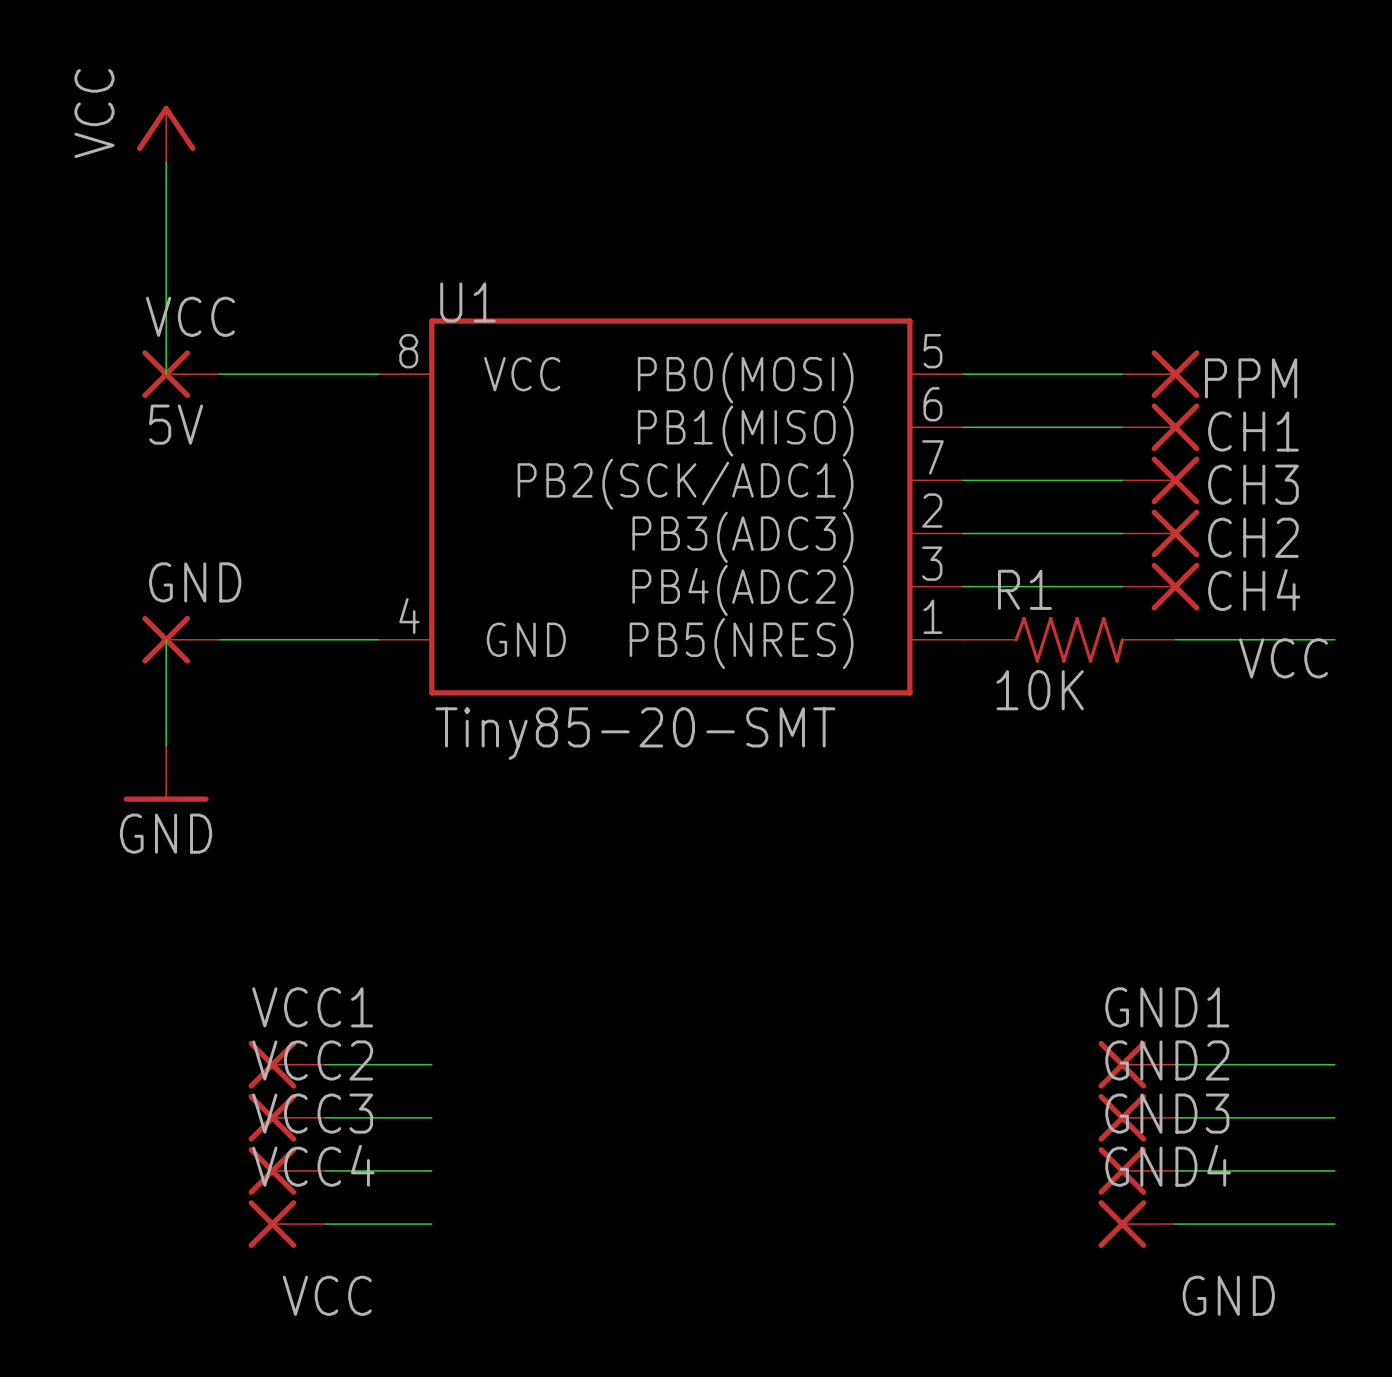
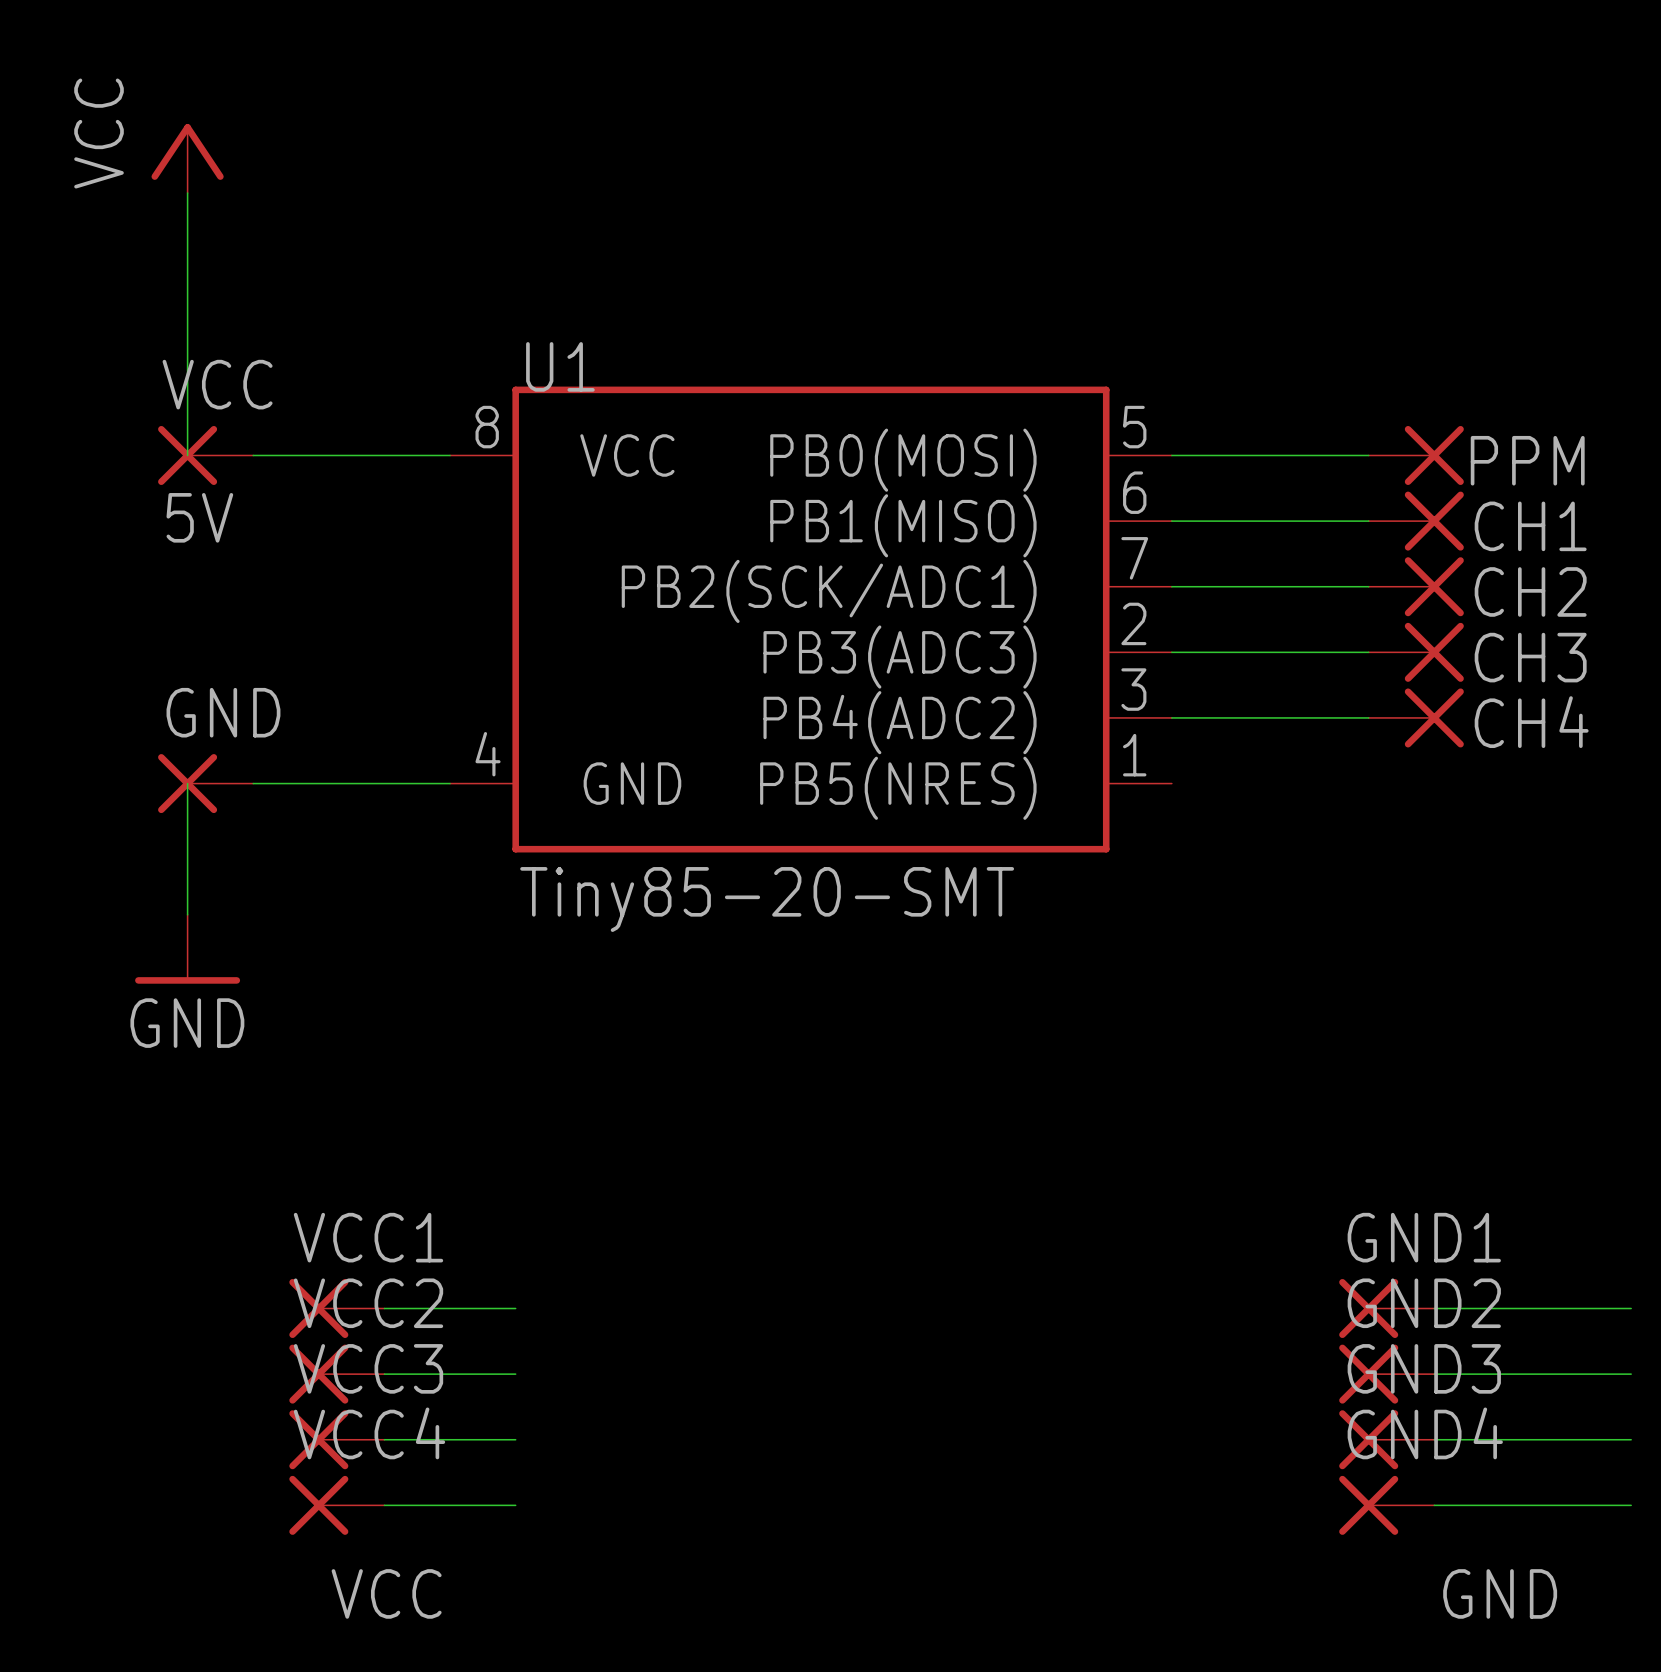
CH3 name: CH3 (1253, 484) -> CH2 (1530, 591)
CH2 name: CH2 (1253, 537) -> CH3 (1530, 657)
R1: 10K (1069, 639) -> none
wire: (1175, 639) (1334, 639) -> none
label: VCC (1283, 658) -> none

